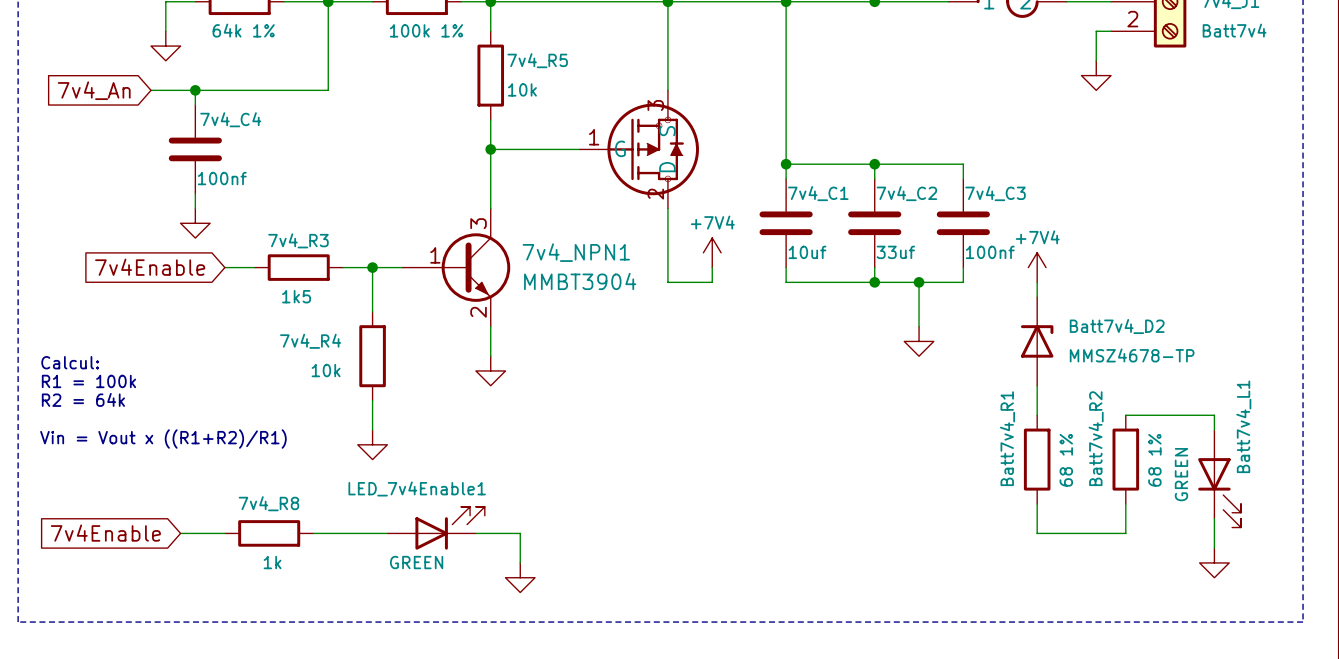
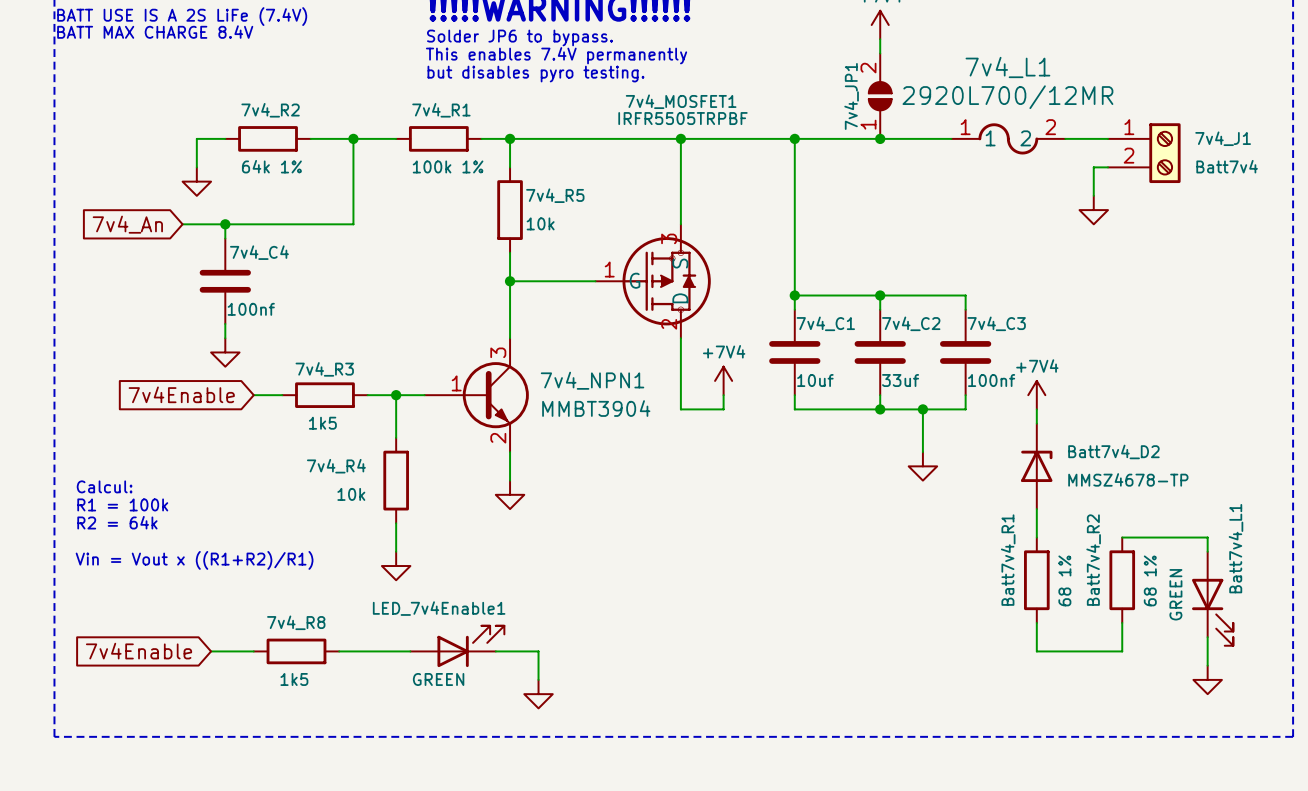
7v4_R8 value: 1k (272, 562) -> 1k5 (294, 679)

